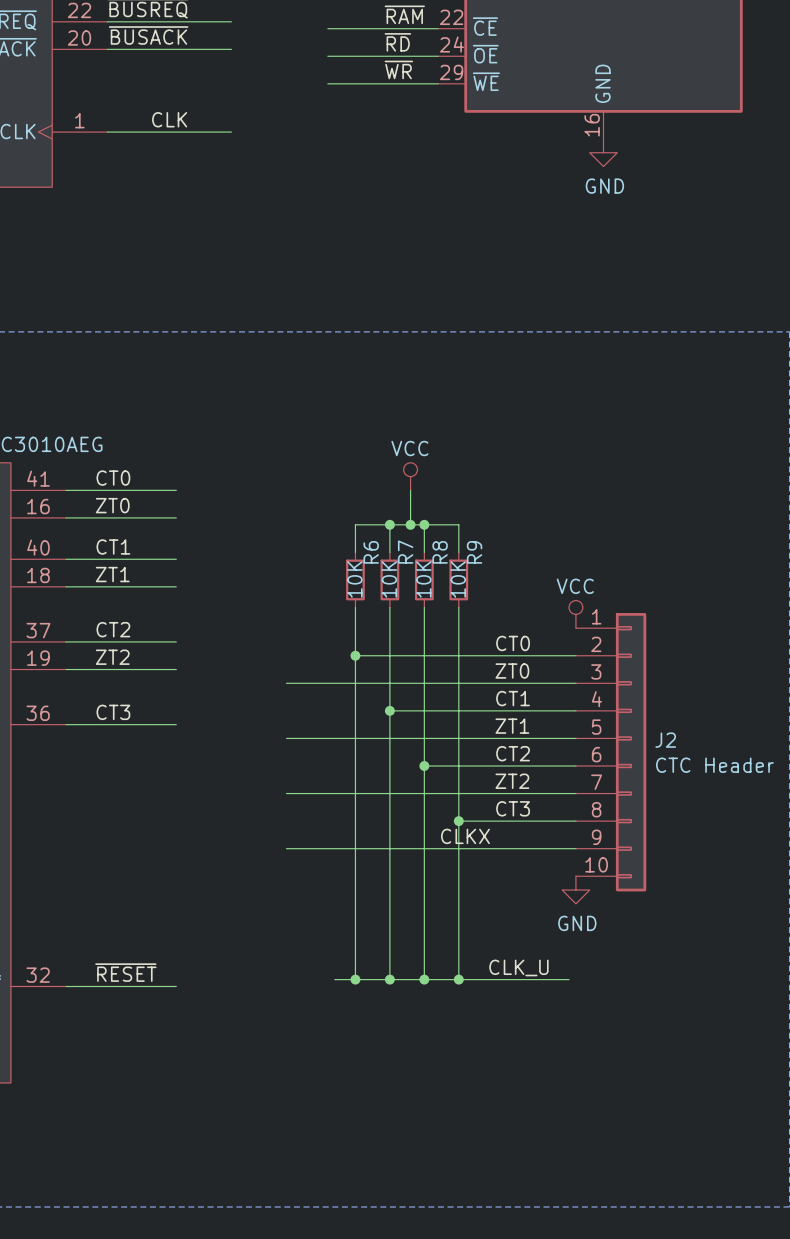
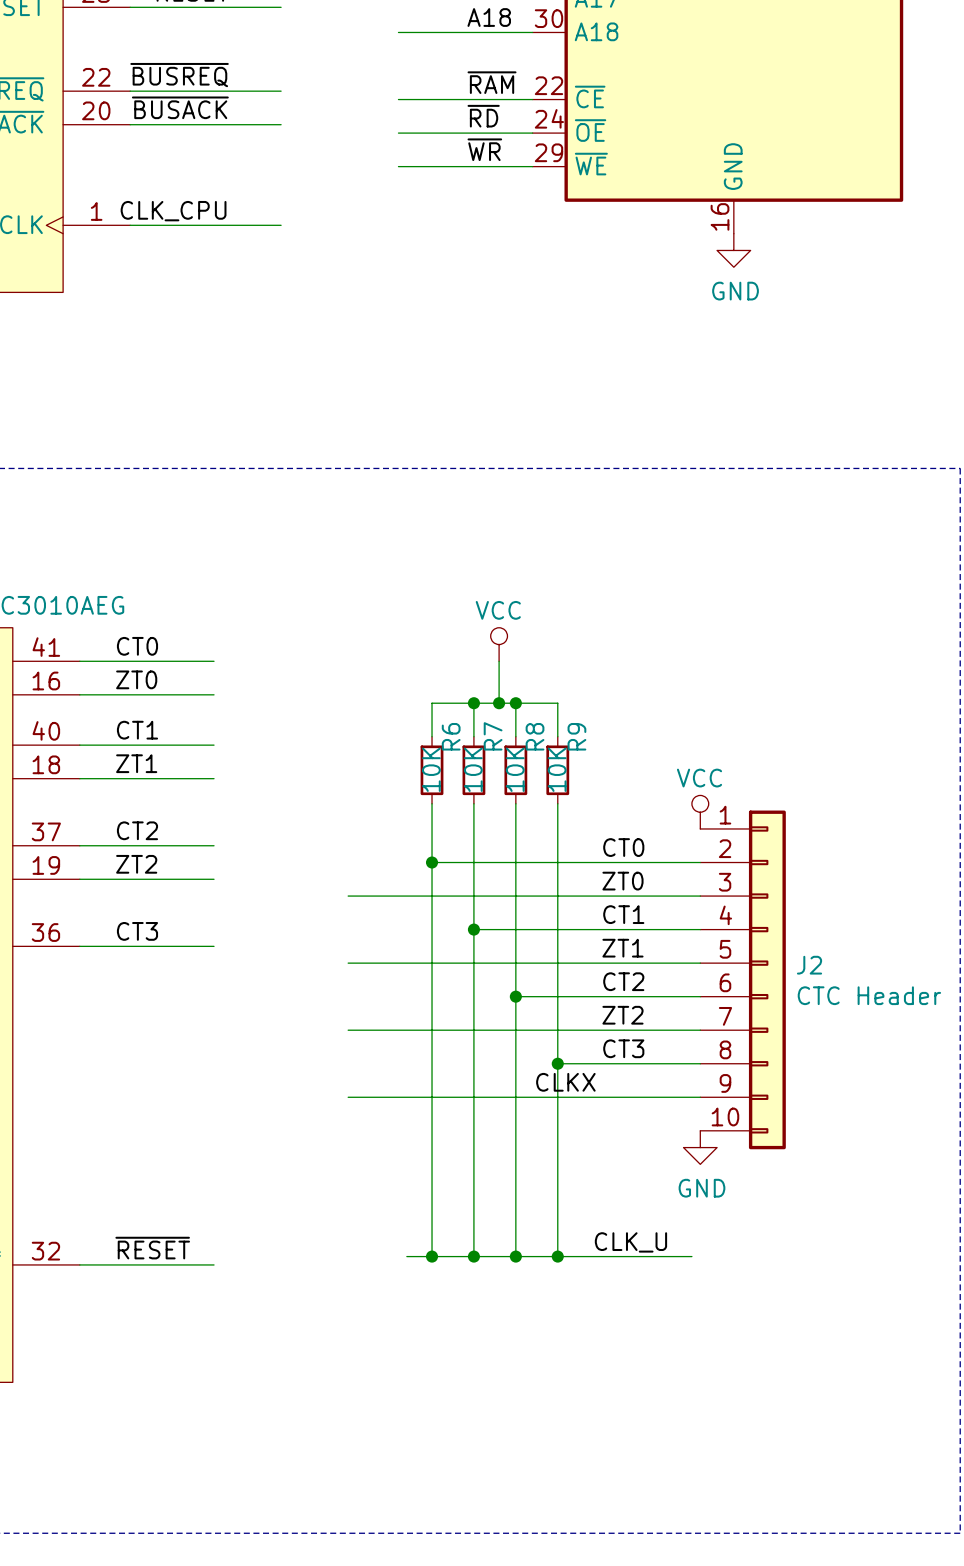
label: CLK (169, 119) -> CLK_CPU (173, 211)

